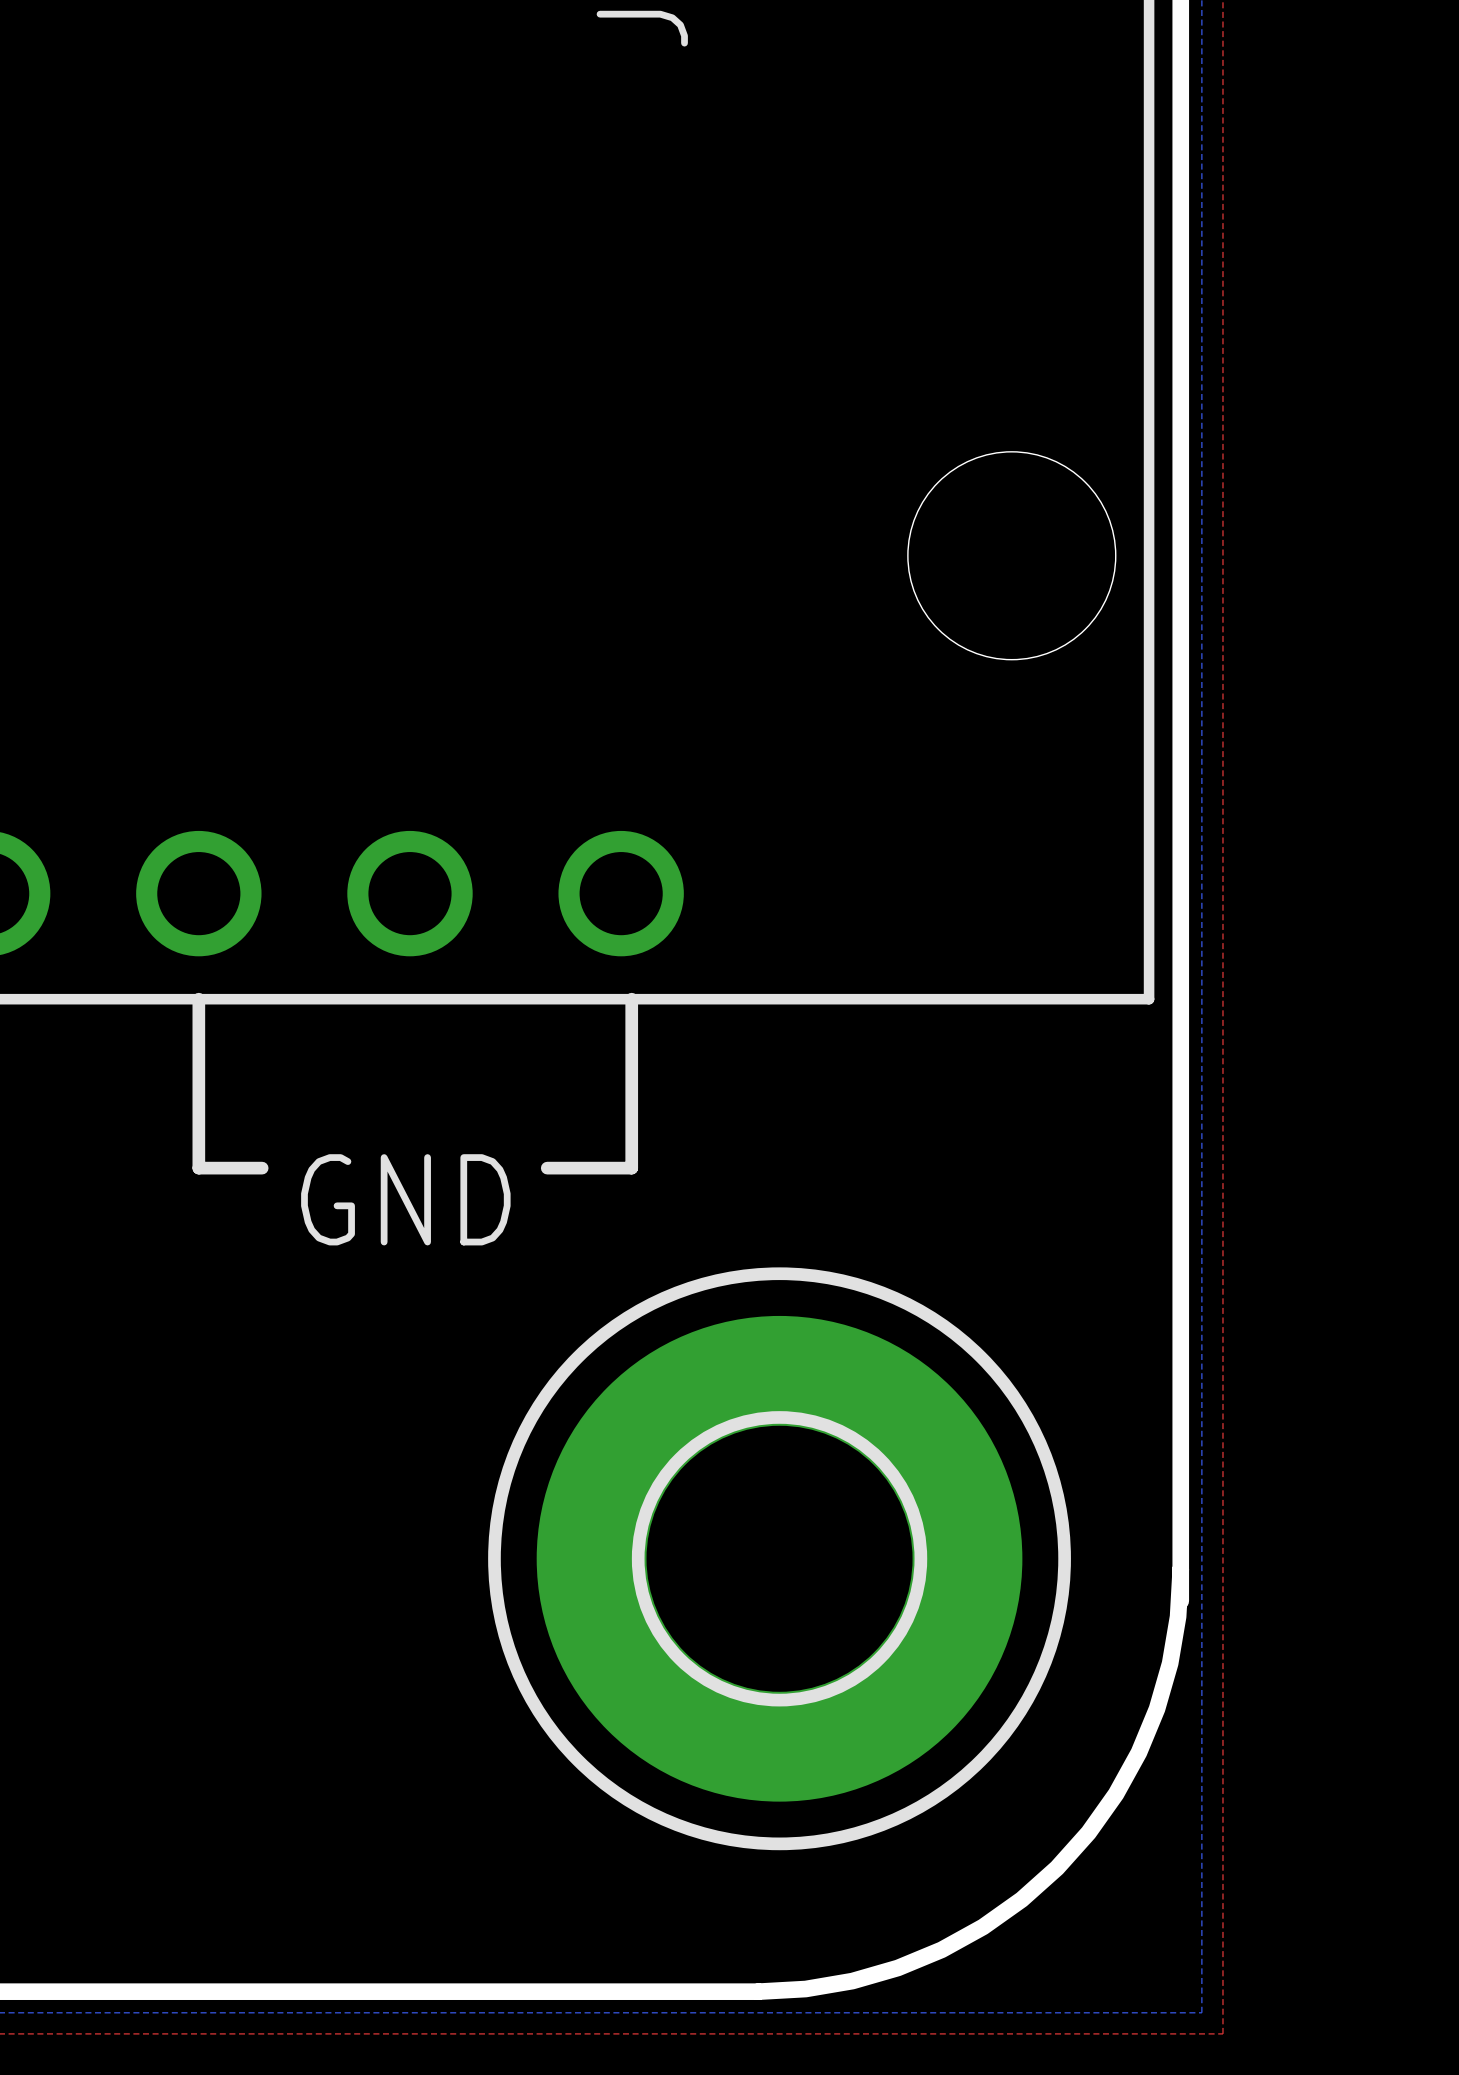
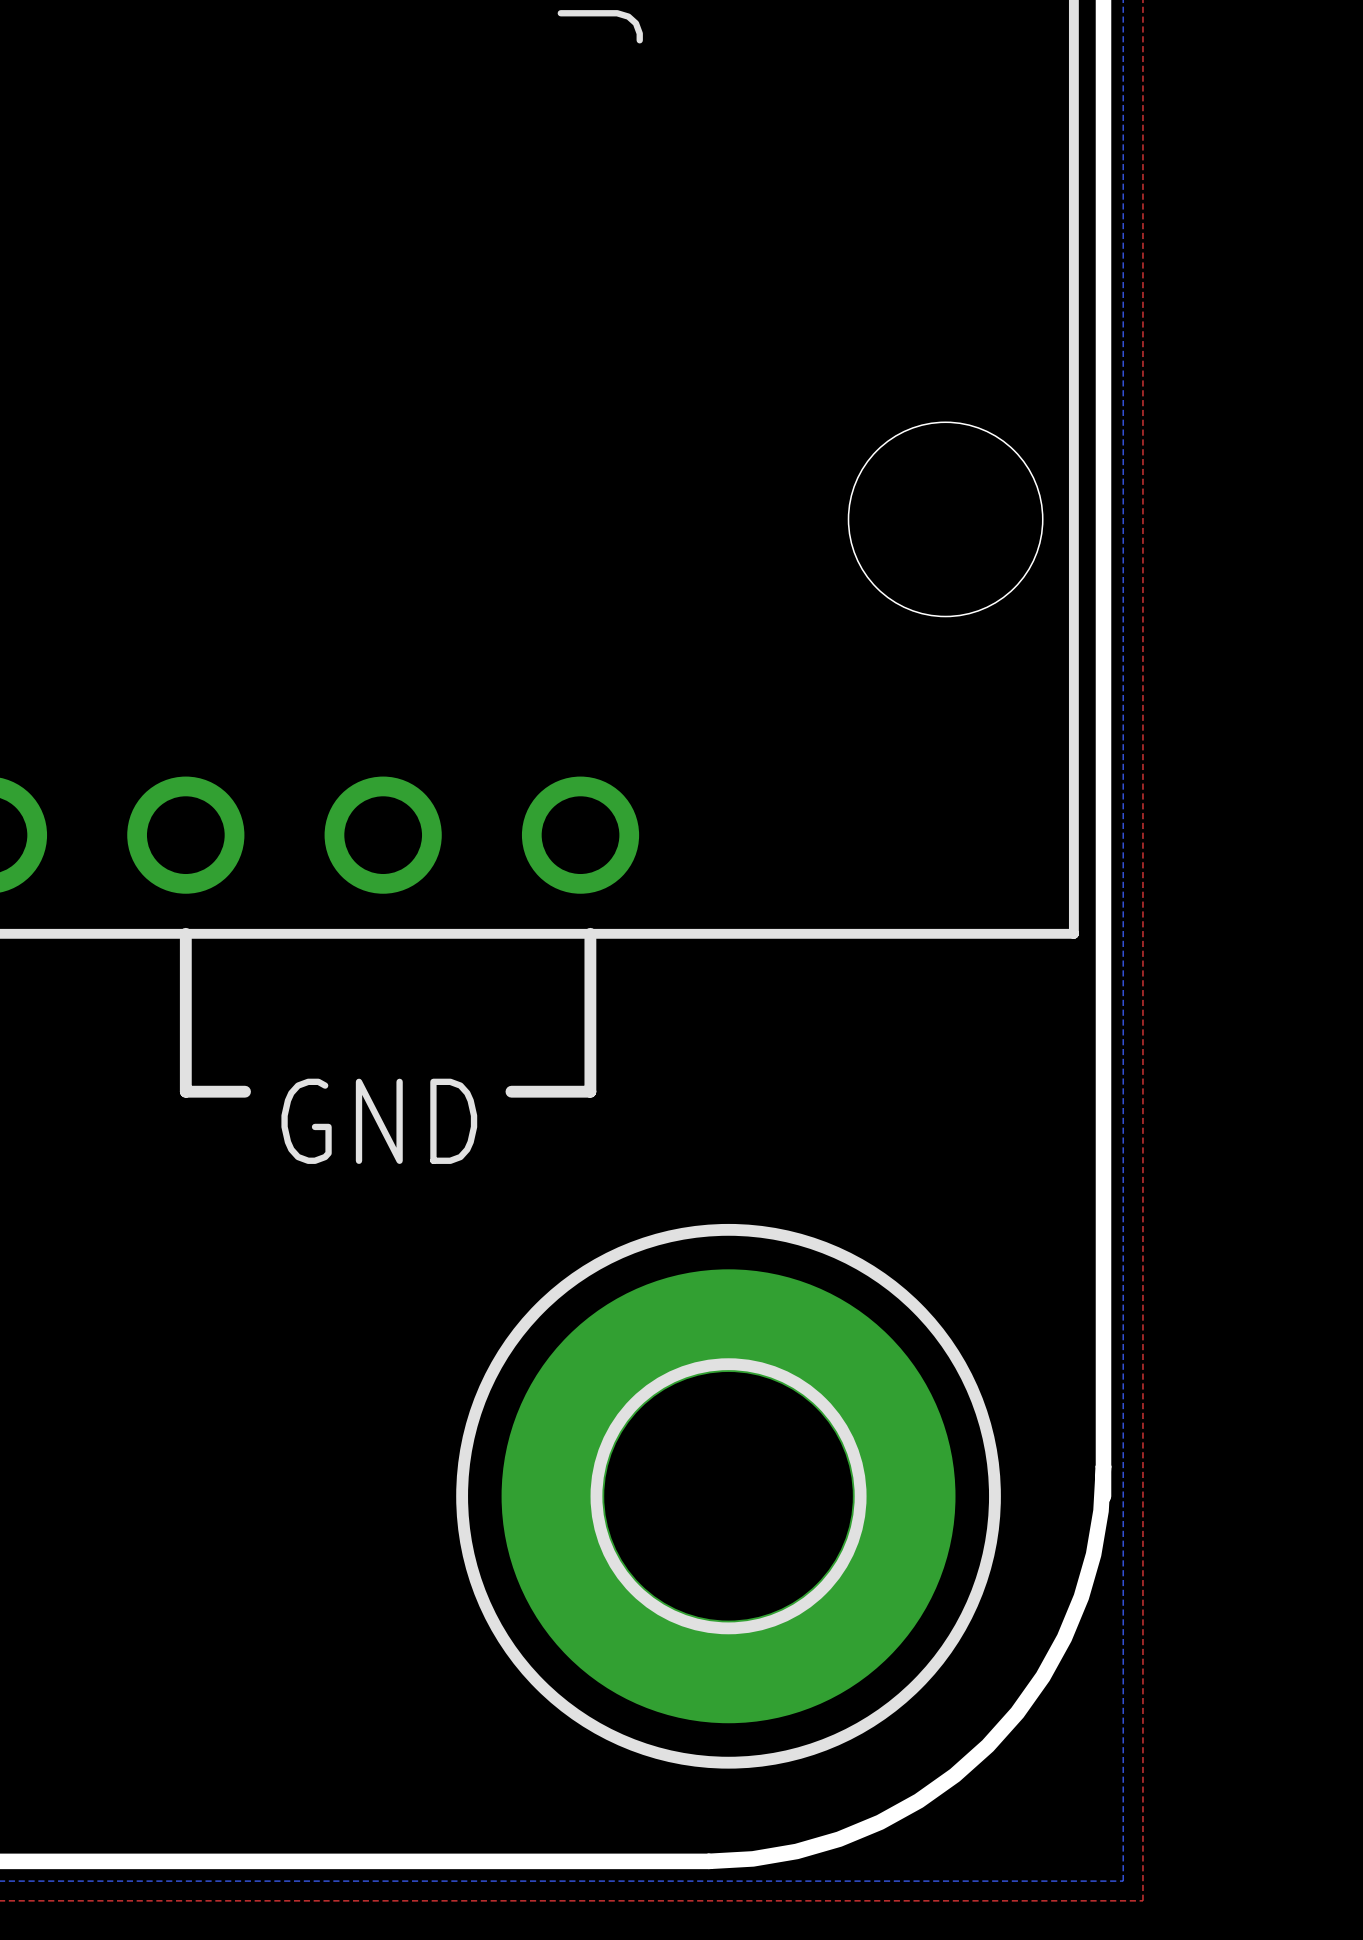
part position: (779, 1558) -> (728, 1496)

